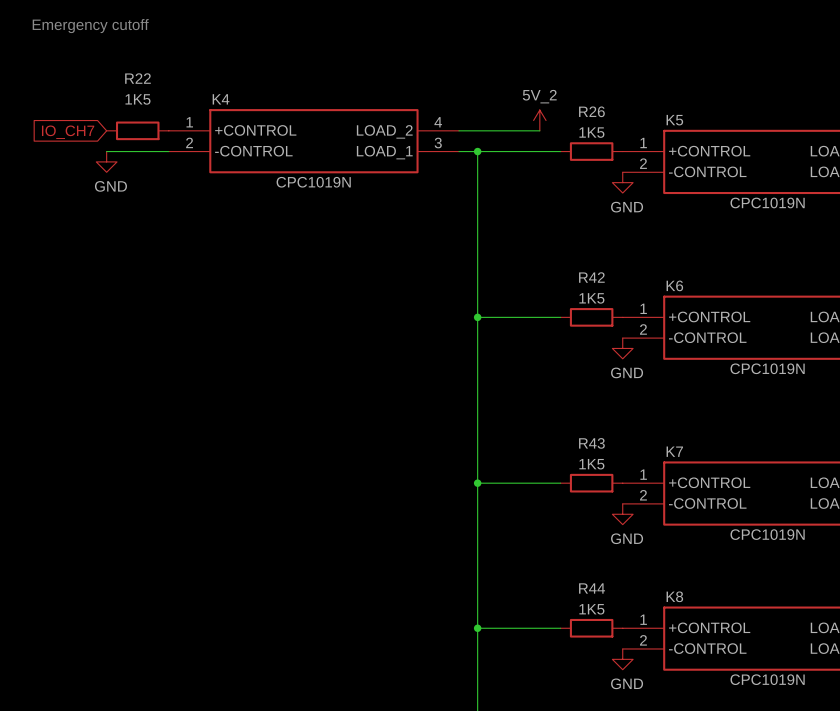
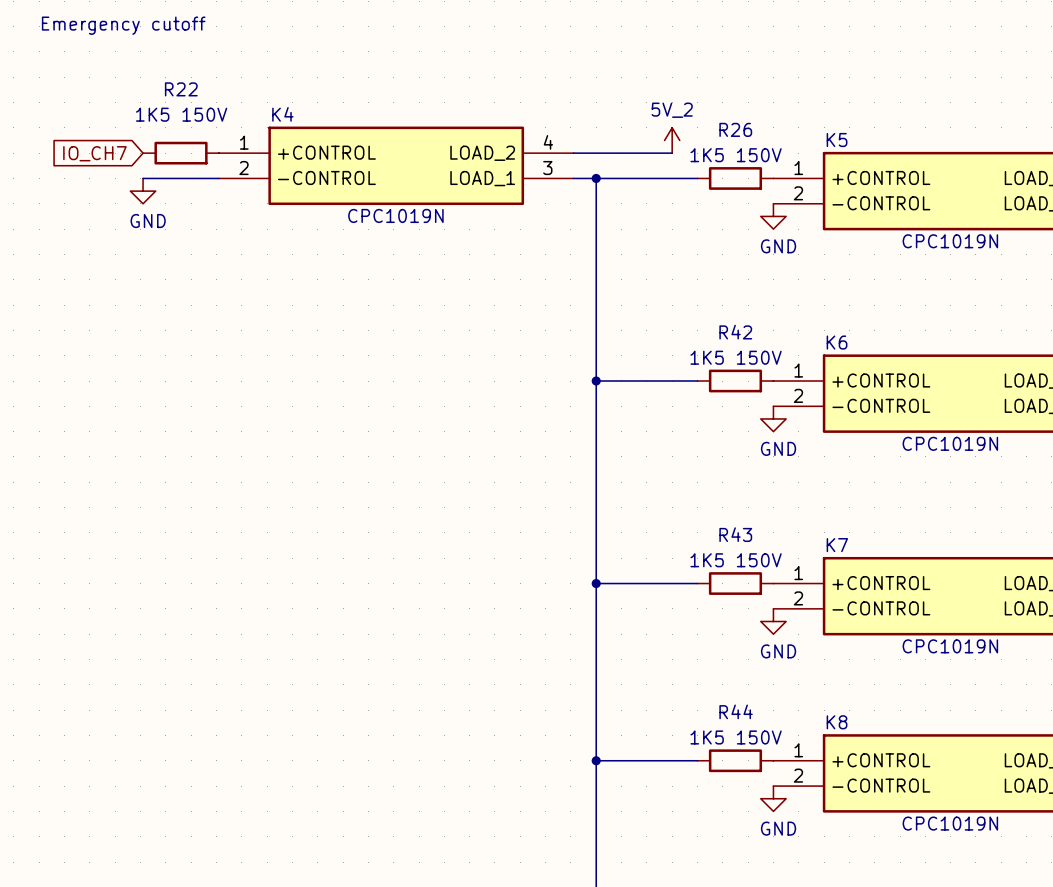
R22 value: 1K5 (138, 99) -> 1K5 150V (181, 114)
R26 value: 1K5 (591, 132) -> 1K5 150V (736, 155)
R42 value: 1K5 (591, 298) -> 1K5 150V (736, 357)
R43 value: 1K5 (591, 464) -> 1K5 150V (736, 560)
R44 value: 1K5 (591, 609) -> 1K5 150V (736, 737)

